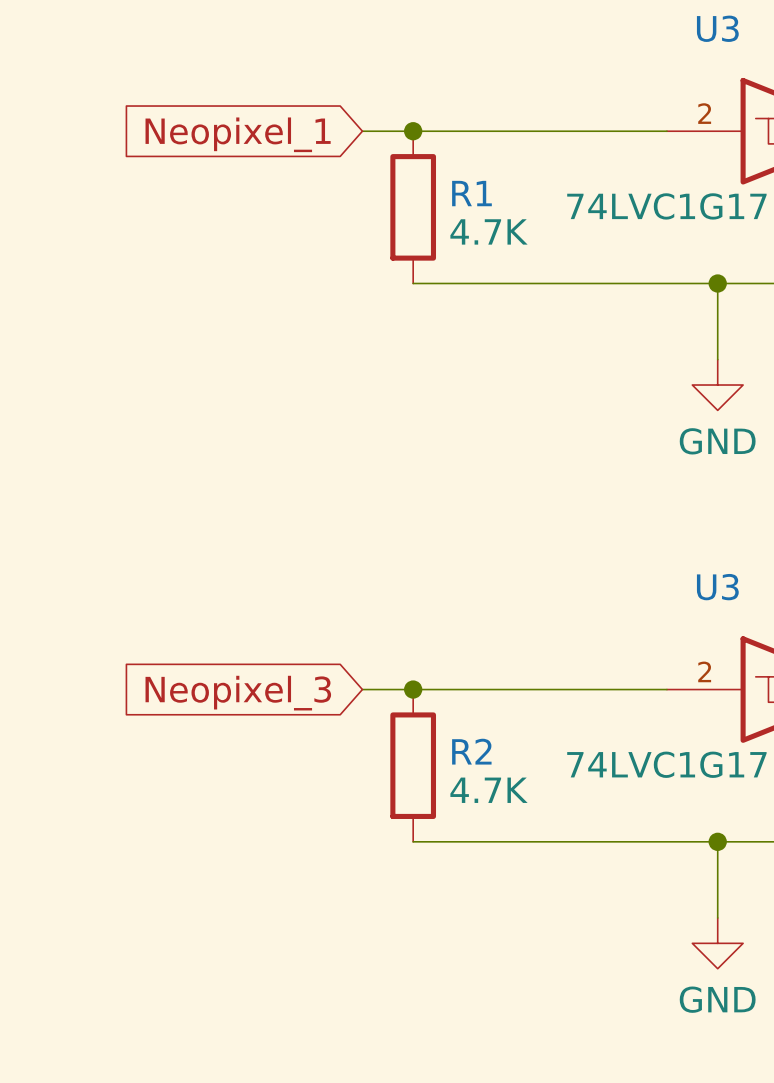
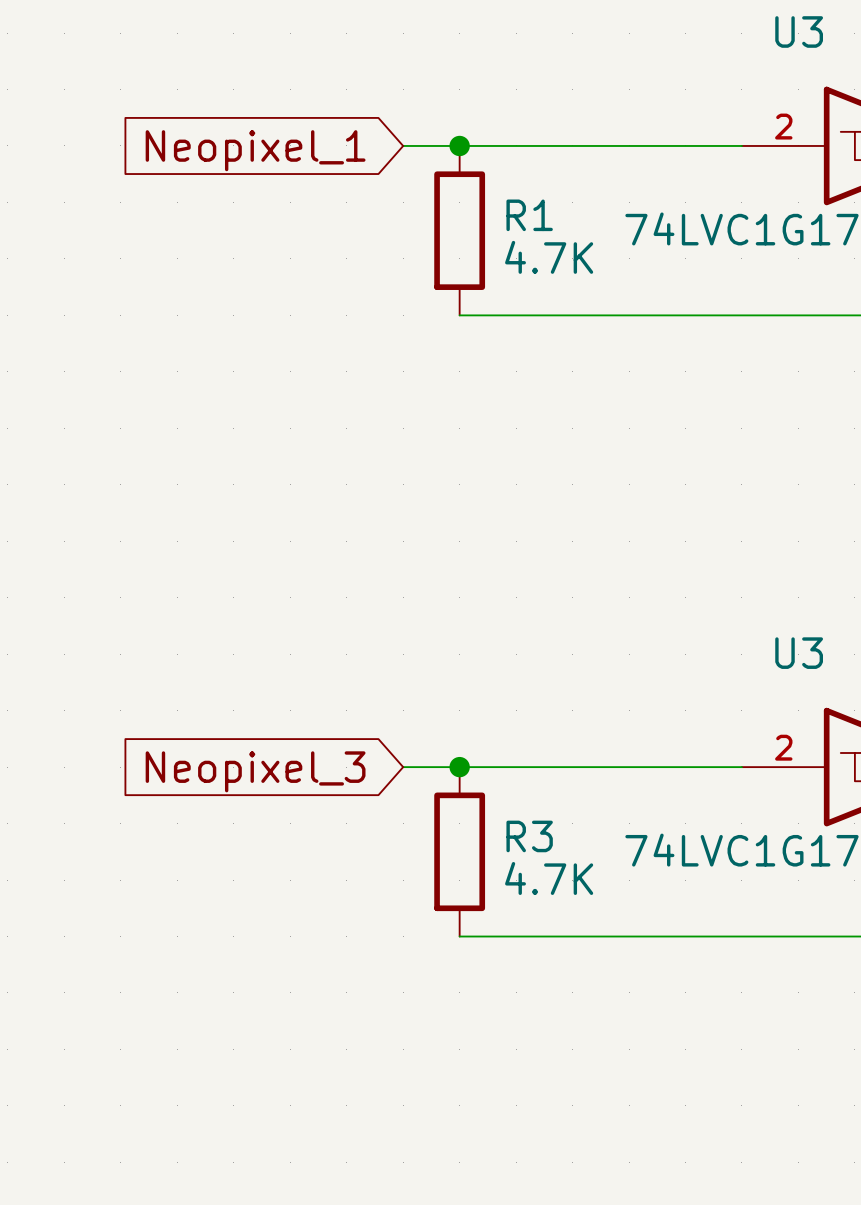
wire: (717, 283) (717, 359) -> none
junction: (717, 283) -> none
power symbol: GND (717, 385) -> none
R2 name: R2 (471, 751) -> R3 (529, 836)
wire: (717, 841) (717, 917) -> none
junction: (717, 841) -> none
power symbol: GND (717, 943) -> none

